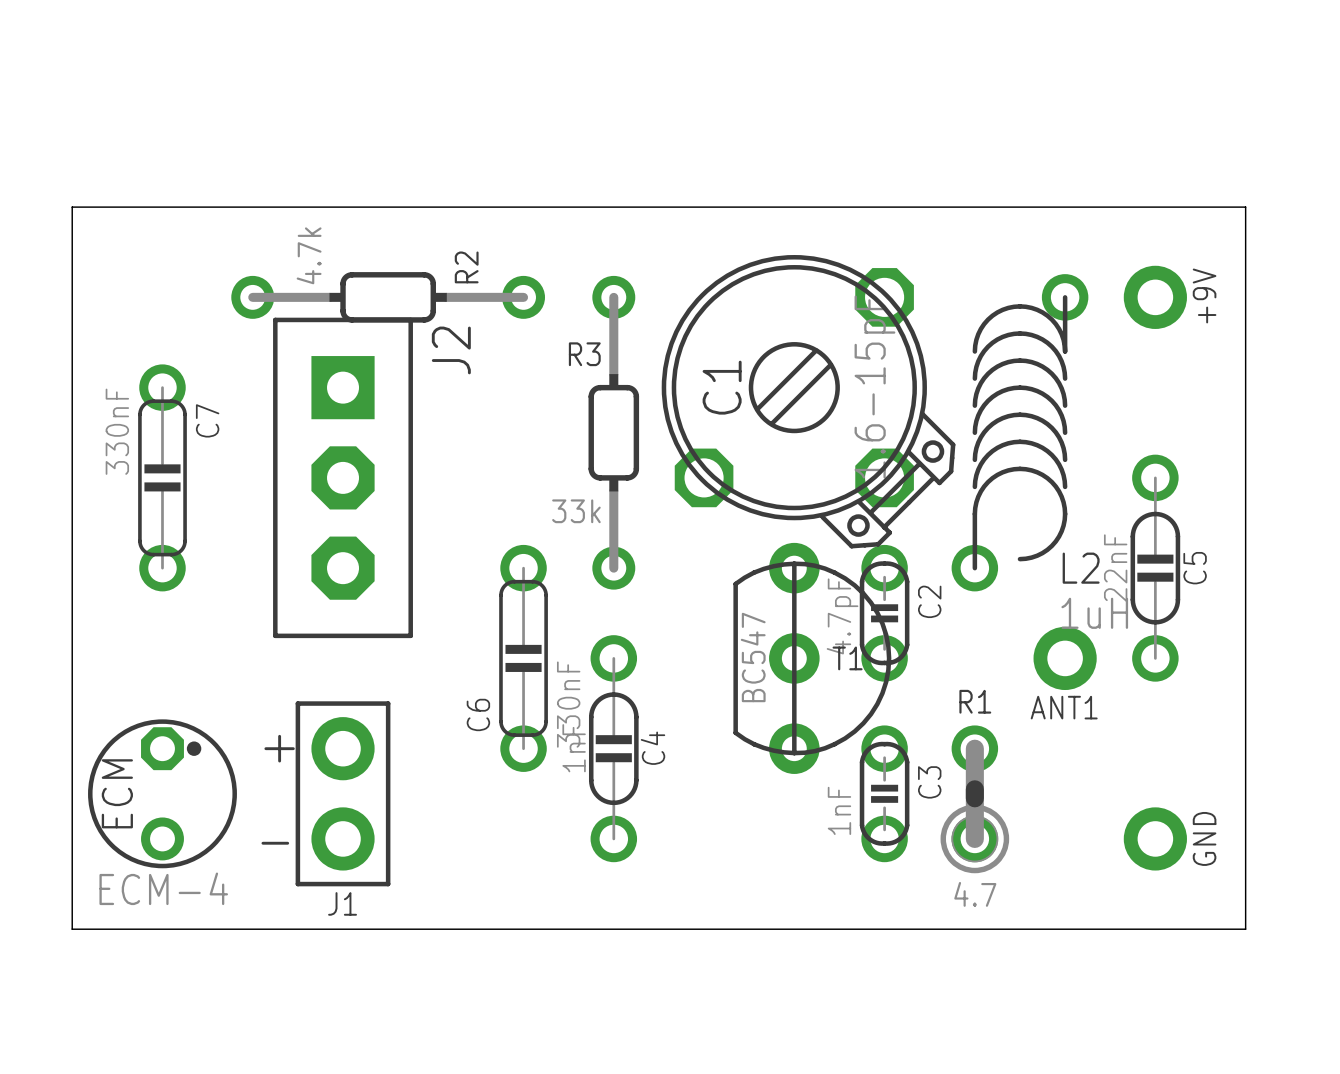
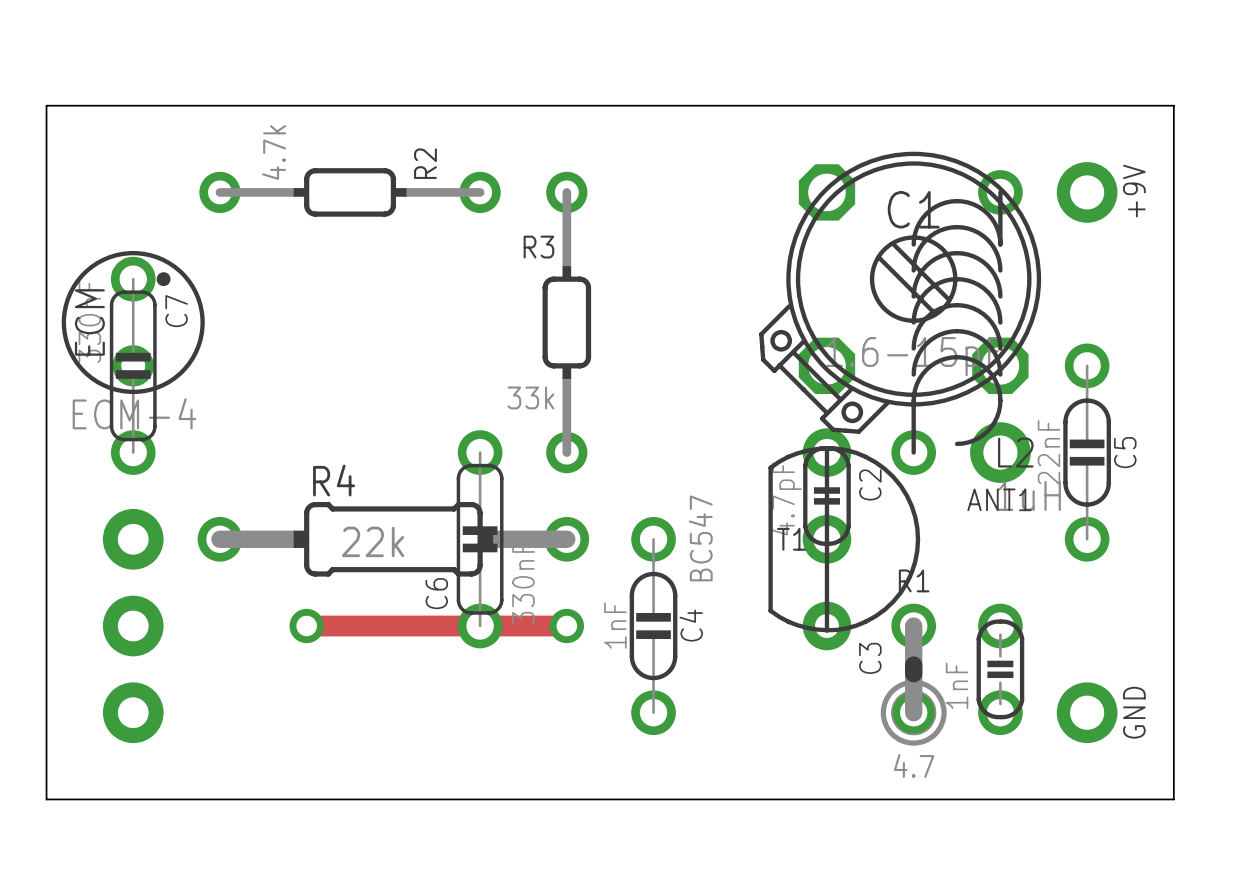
C1 rotation: 0° (808, 401) -> 90° clockwise (900, 292)
J2: (343, 477) -> none
R4: none -> 22k (393, 539)
T1 position: (812, 658) -> (844, 539)
ANT1 position: (1065, 658) -> (1000, 452)
part: none -> (133, 626)
track: none -> (306, 626) (566, 626)
via: none -> (306, 626)
C4 position: (613, 748) -> (653, 626)
via: none -> (566, 626)
ECM position: (162, 793) -> (133, 322)
J1: (343, 793) -> none
C3 position: (884, 793) -> (1000, 669)

